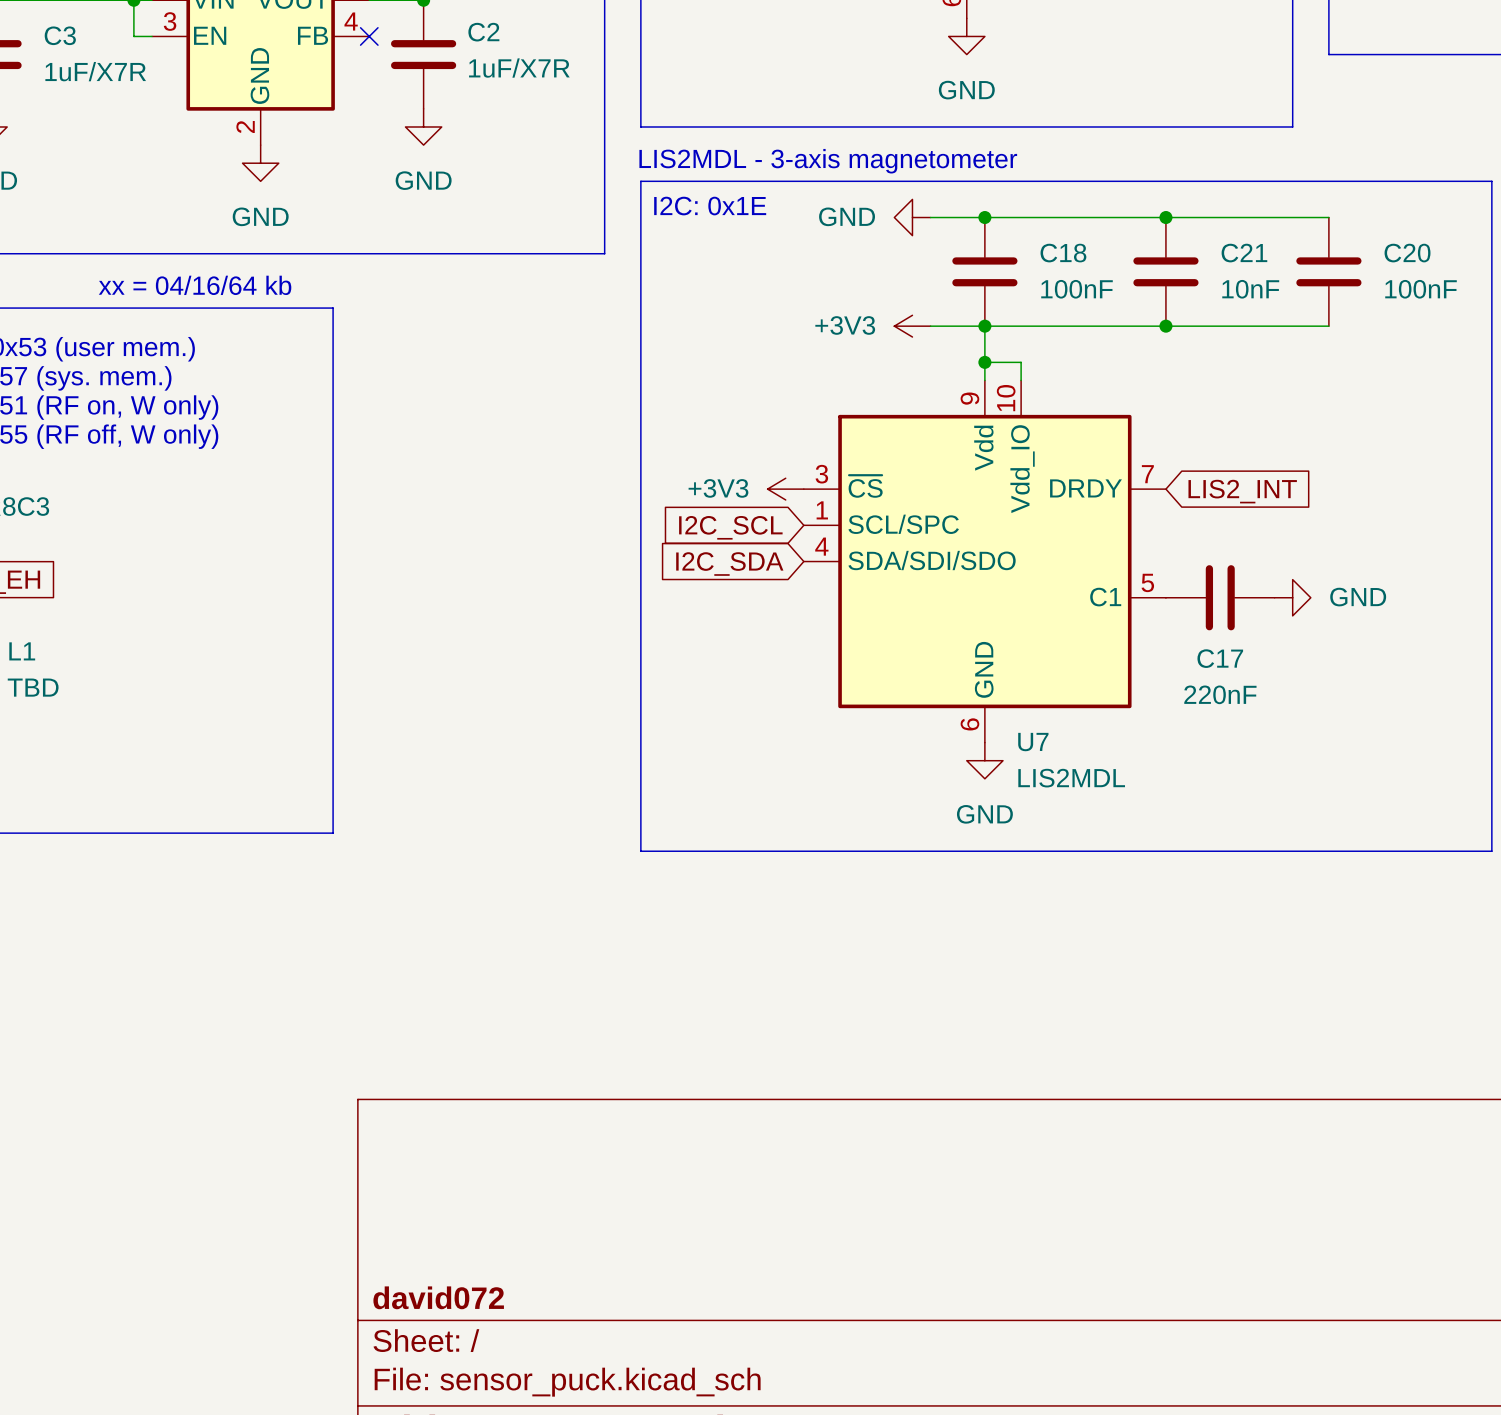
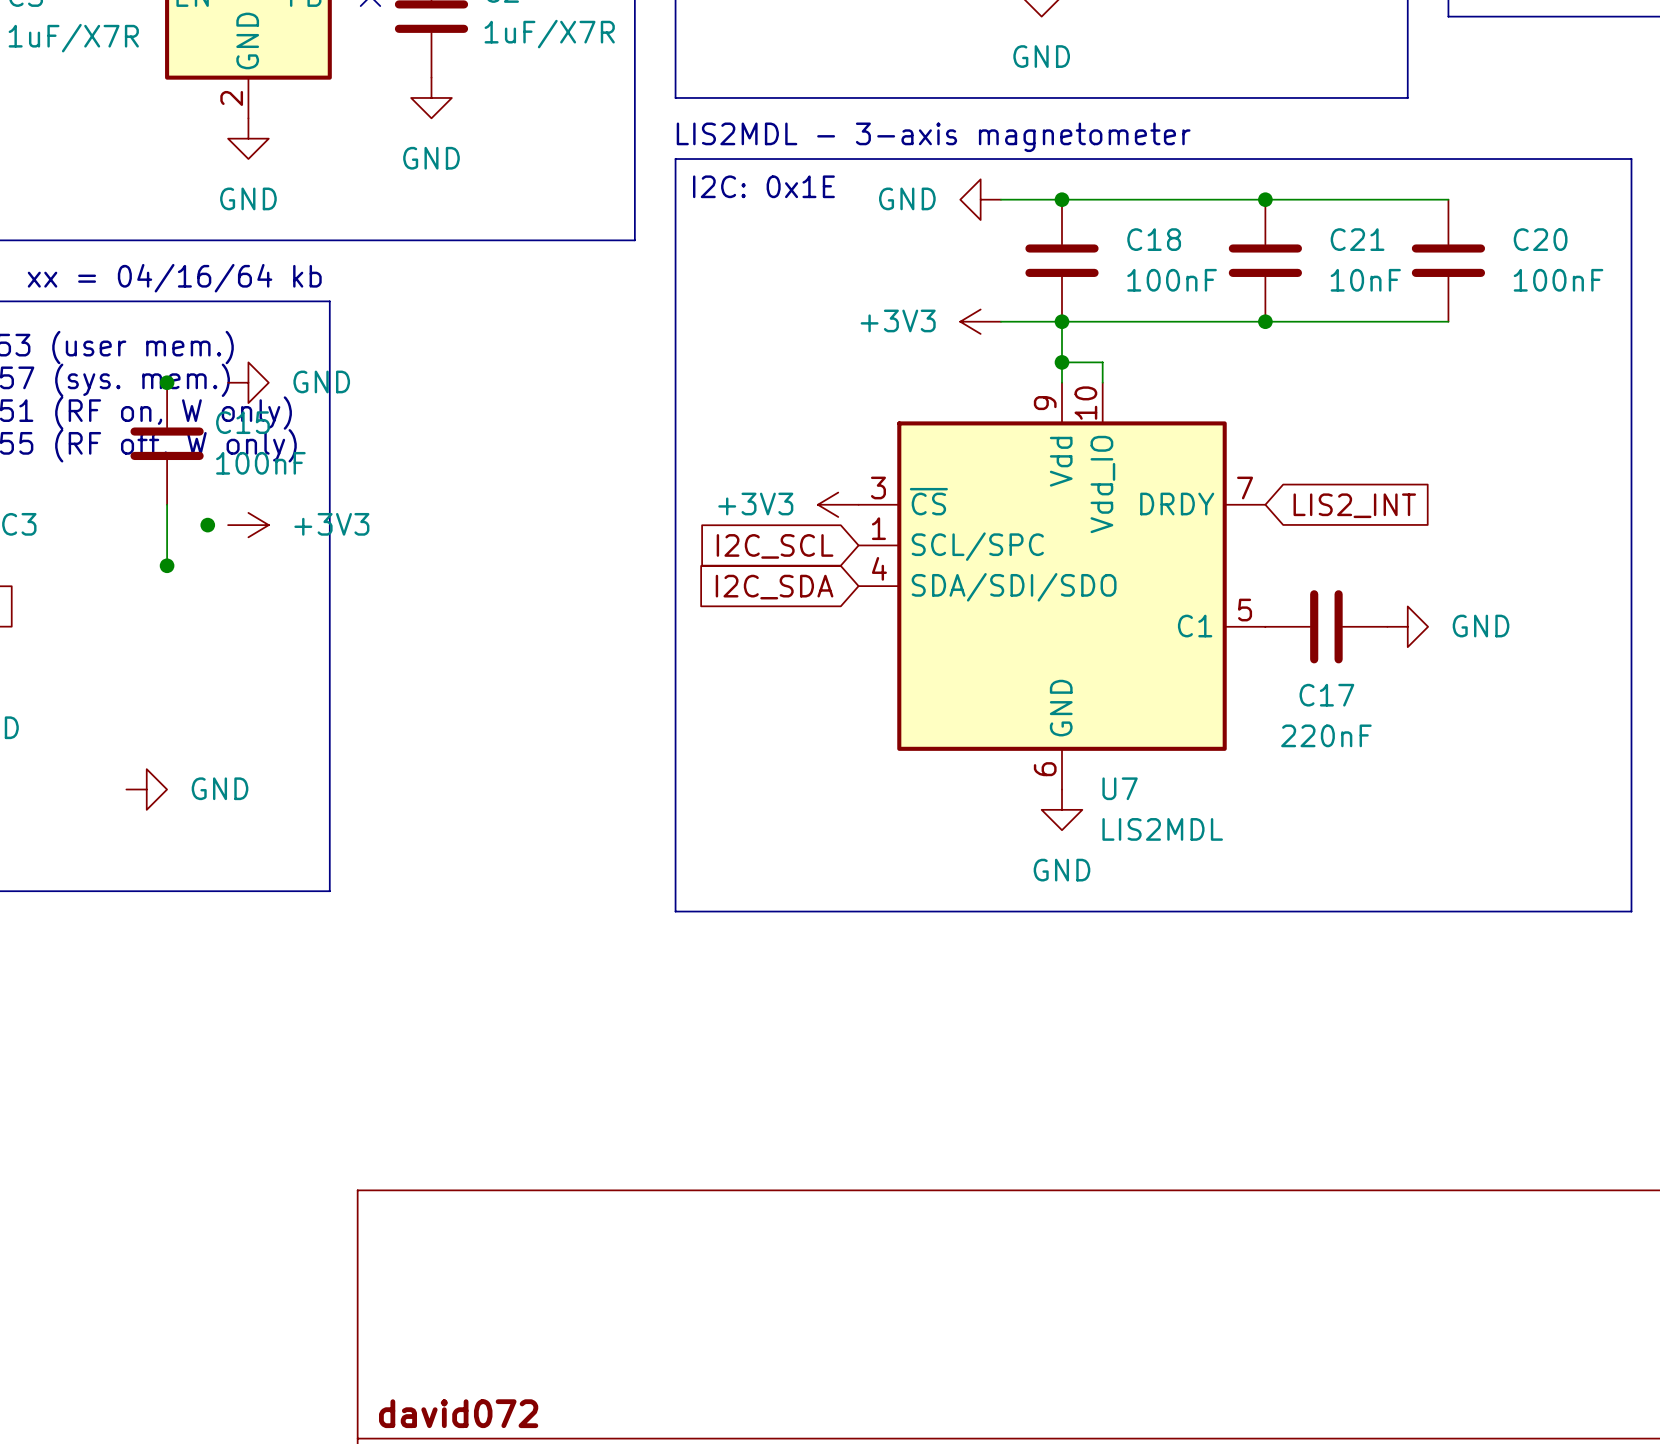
junction: none -> (167, 382)
power symbol: none -> GND (248, 382)
C15: none -> 100nF (167, 443)
wire: none -> (167, 504) (167, 565)
junction: none -> (207, 525)
power symbol: none -> +3V3 (248, 525)
junction: none -> (167, 565)
power symbol: none -> GND (146, 789)

